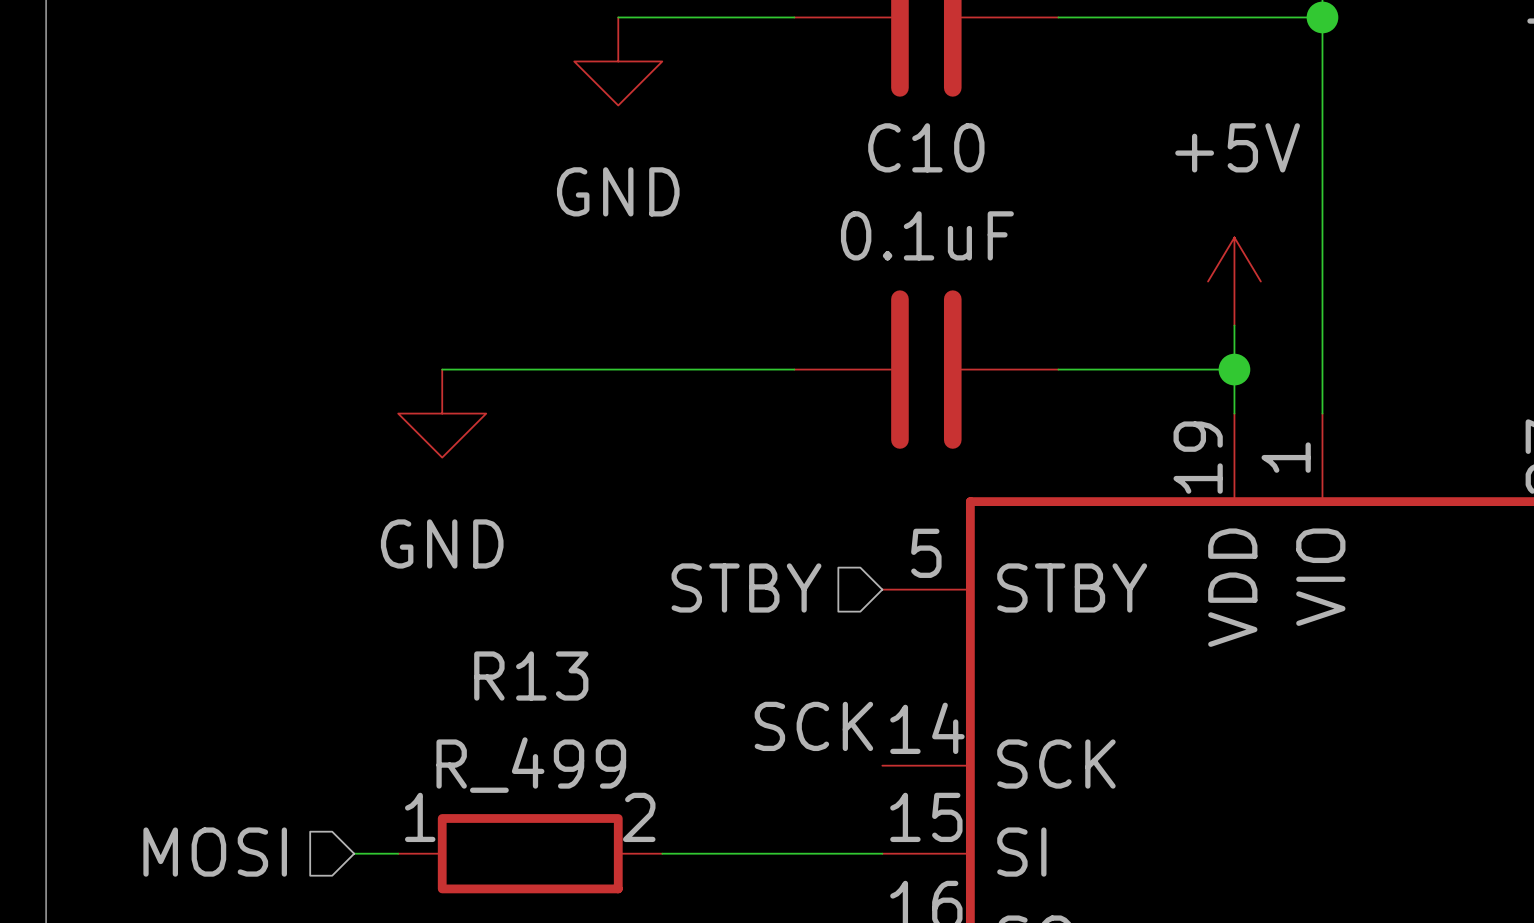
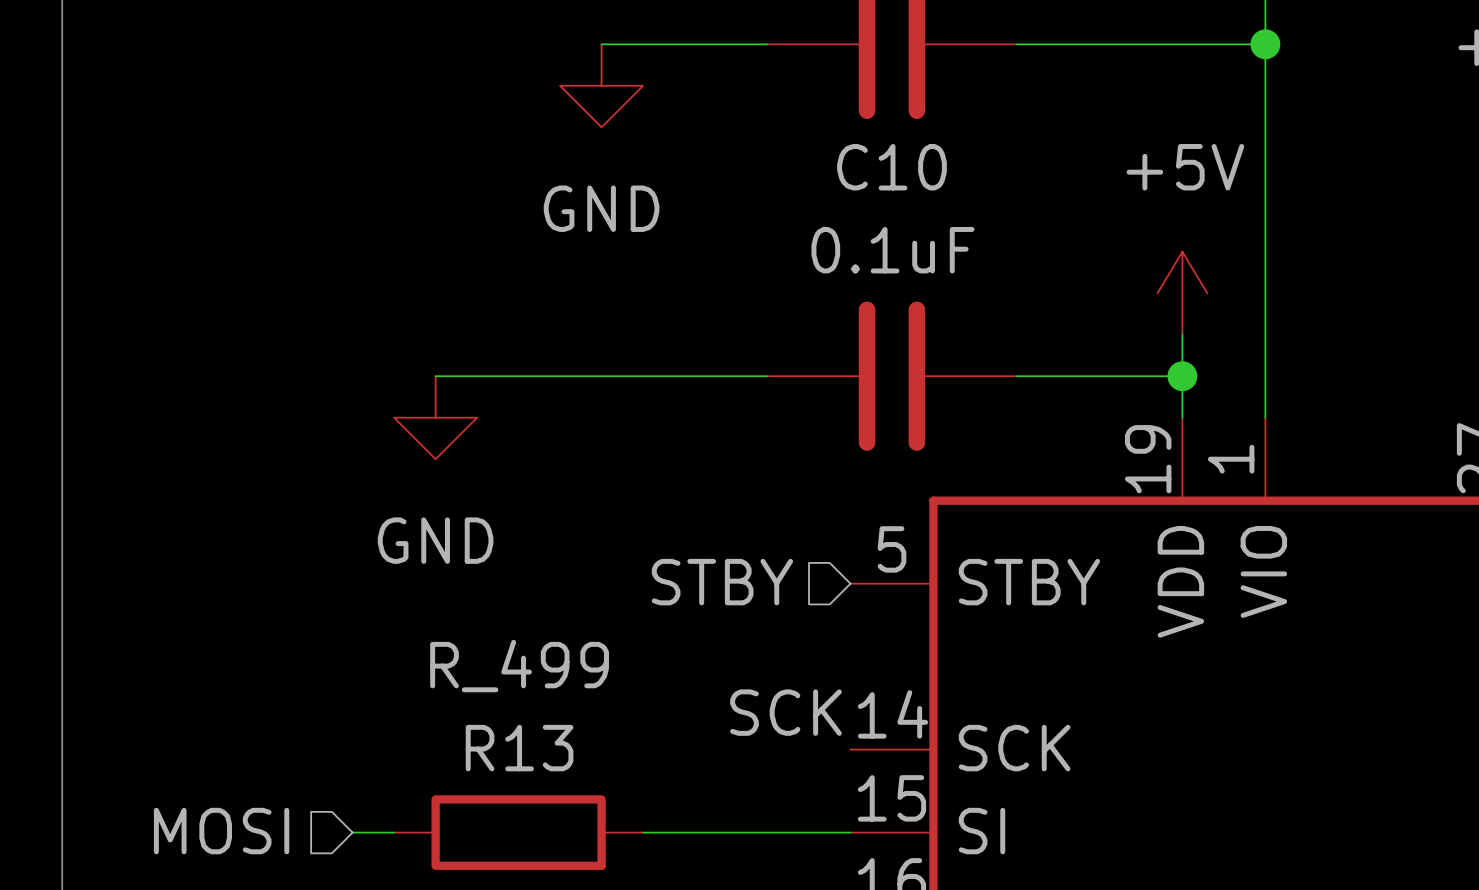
R13 name position: R13 (531, 676) -> R13 (519, 748)
R13 value position: R_499 (531, 765) -> R_499 (519, 666)
R13 pin number: 1 (420, 817) -> none
R13 pin number: 2 (639, 817) -> none

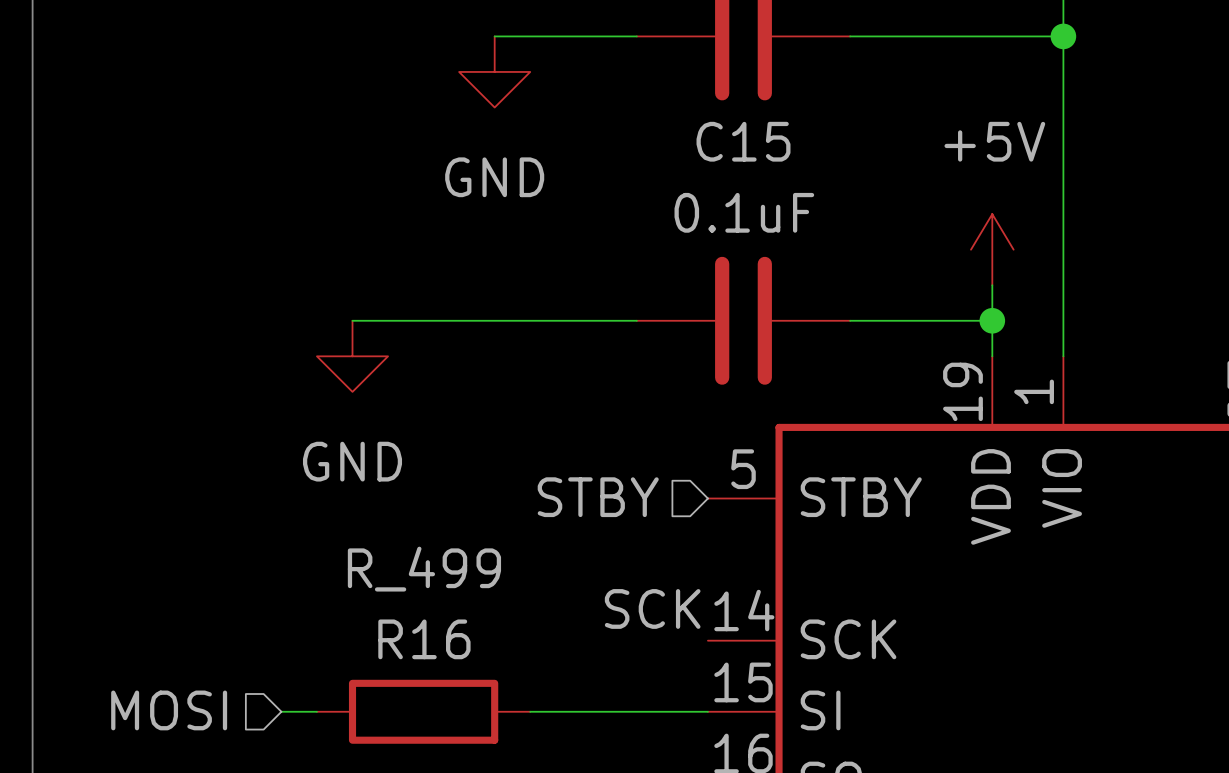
C10 name: C10 (891, 167) -> C15 (743, 141)
R13 name: R13 (519, 748) -> R16 (424, 639)

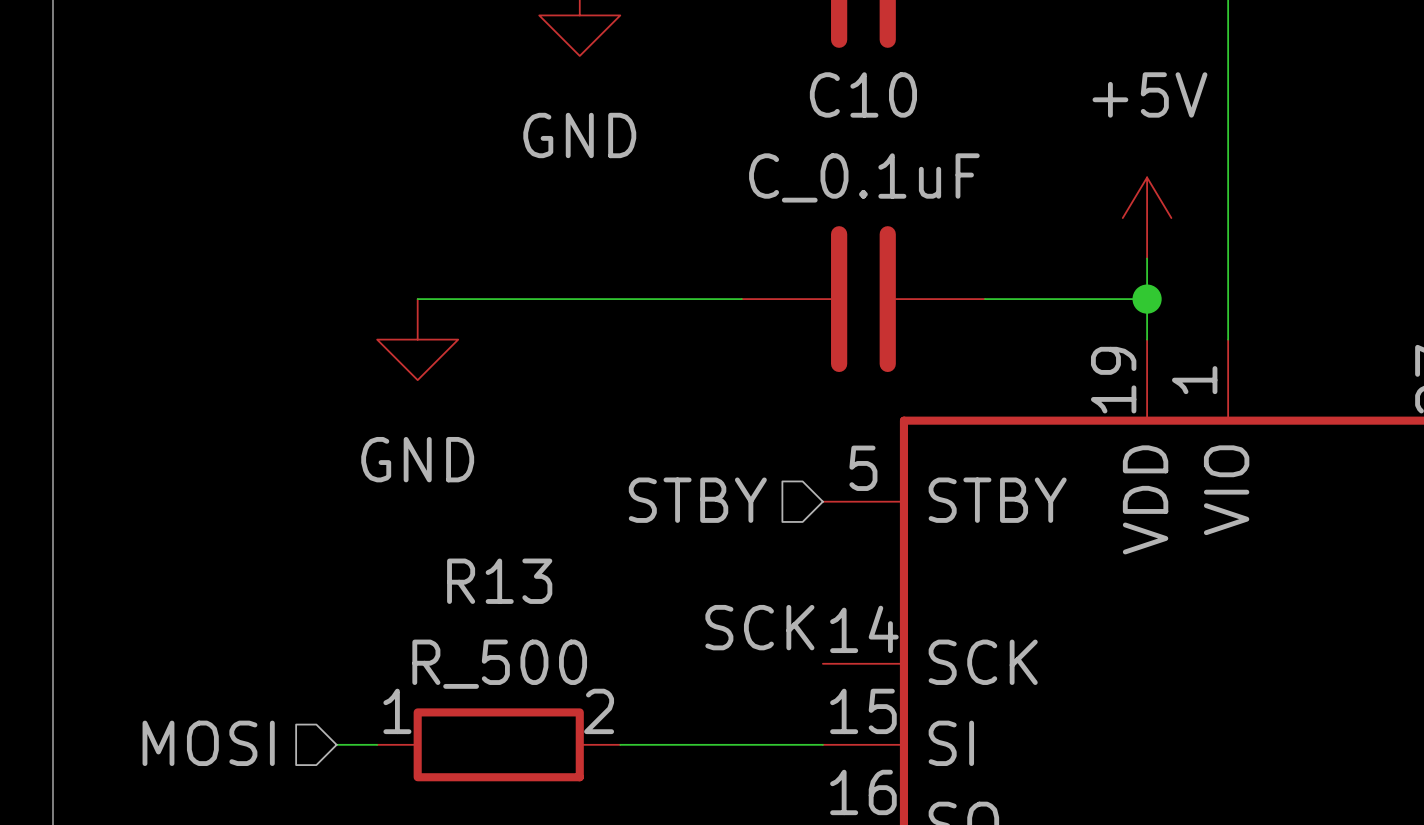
C15 name: C15 (743, 141) -> C10 (863, 94)
C15 value: 0.1uF (744, 212) -> C_0.1uF (864, 177)
R16 value: R_499 (424, 569) -> R_500 (499, 664)
R16 name: R16 (424, 639) -> R13 (499, 581)
R16 pin number: none -> 1 (397, 711)
R16 pin number: none -> 2 (599, 711)

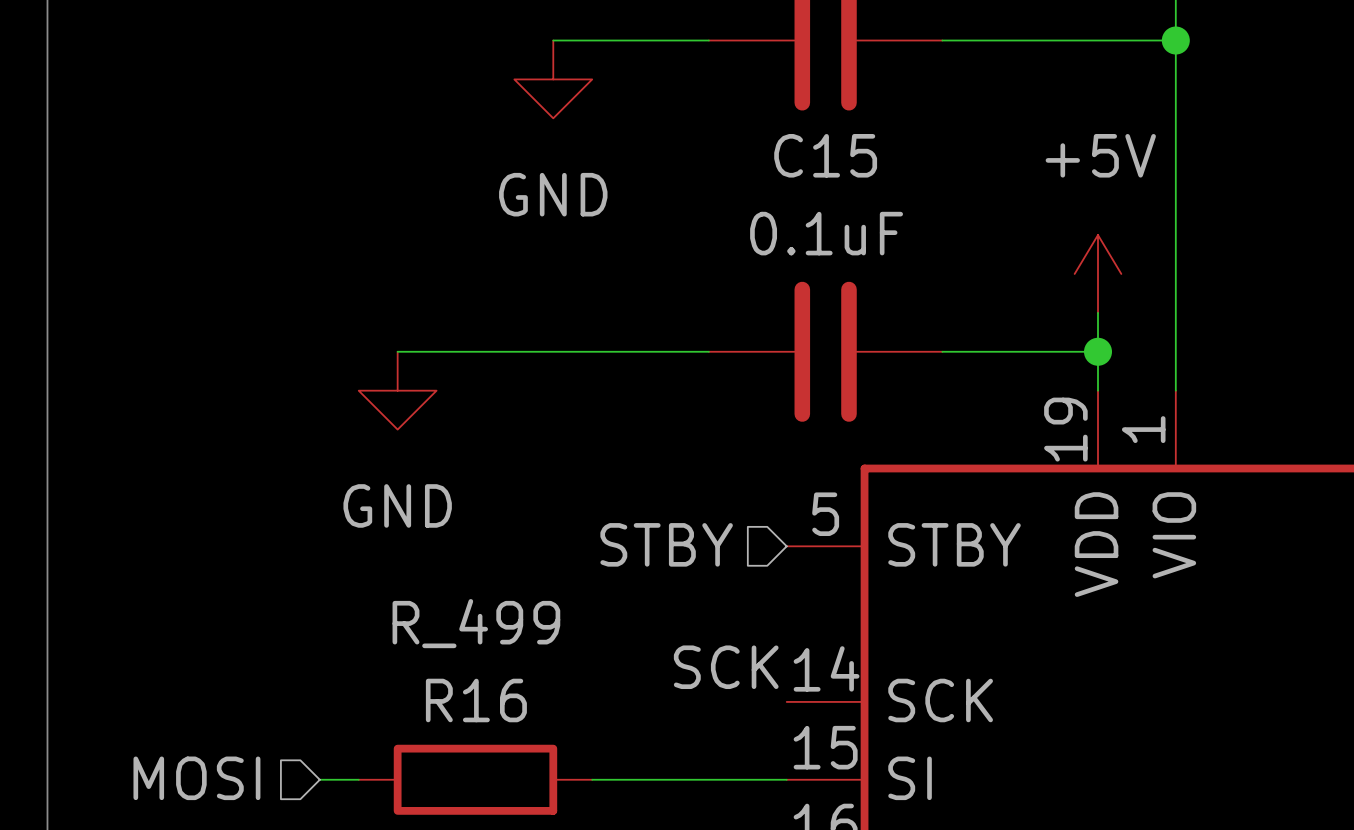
C10 name: C10 (863, 94) -> C15 (825, 155)
C10 value: C_0.1uF (864, 177) -> 0.1uF (826, 233)
R13 name: R13 (499, 581) -> R16 (476, 700)
R13 value: R_500 (499, 664) -> R_499 (476, 623)
R13 pin number: 1 (397, 711) -> none
R13 pin number: 2 (599, 711) -> none

